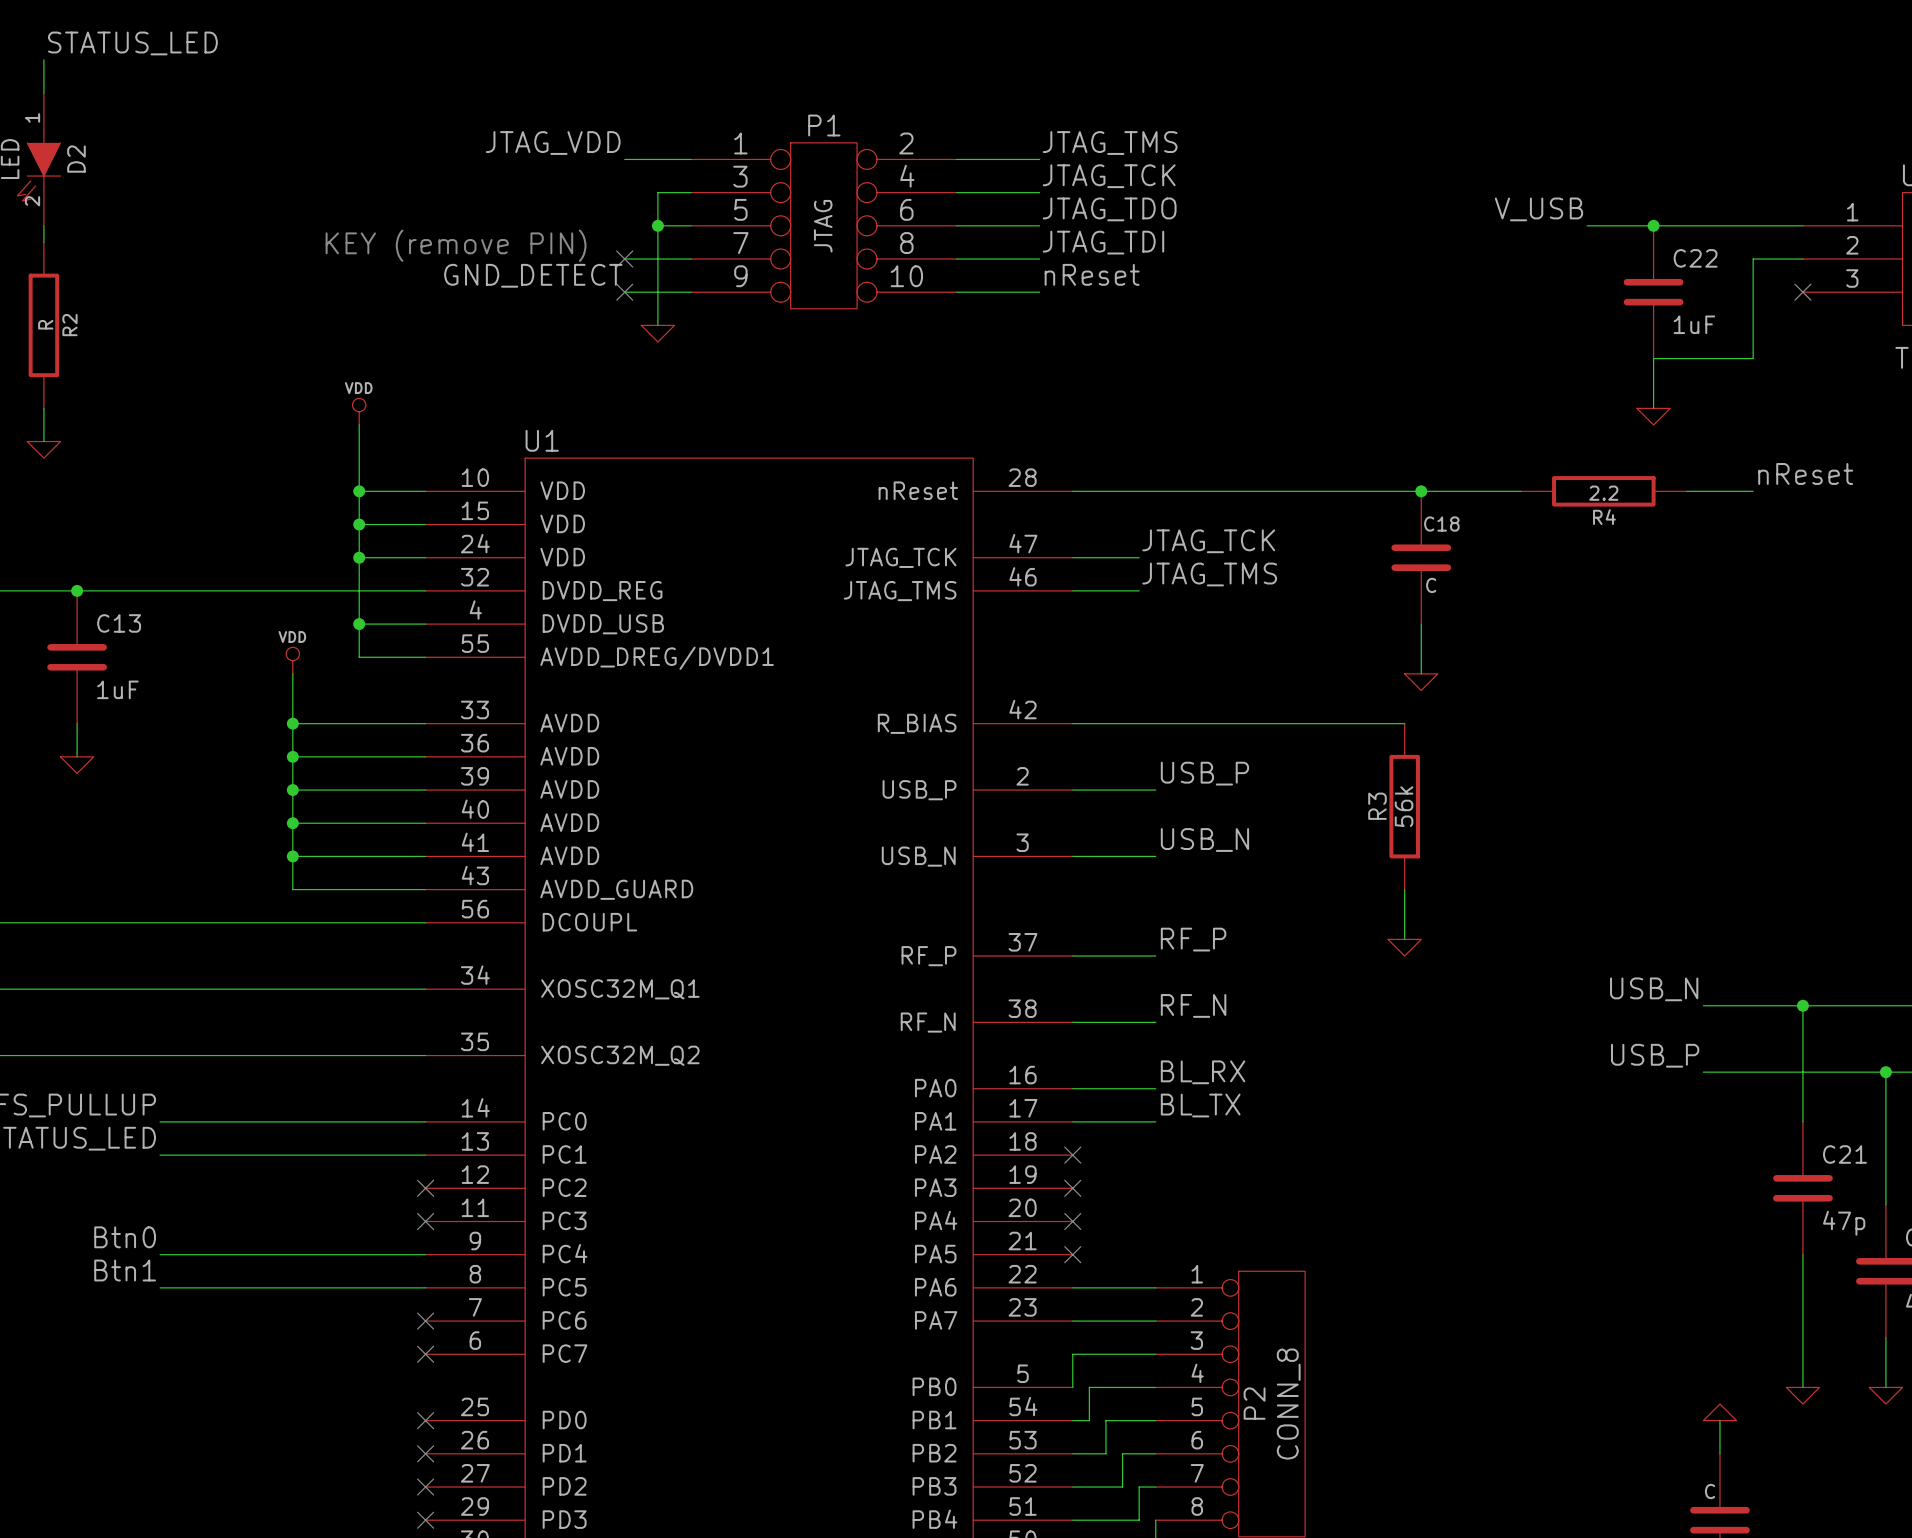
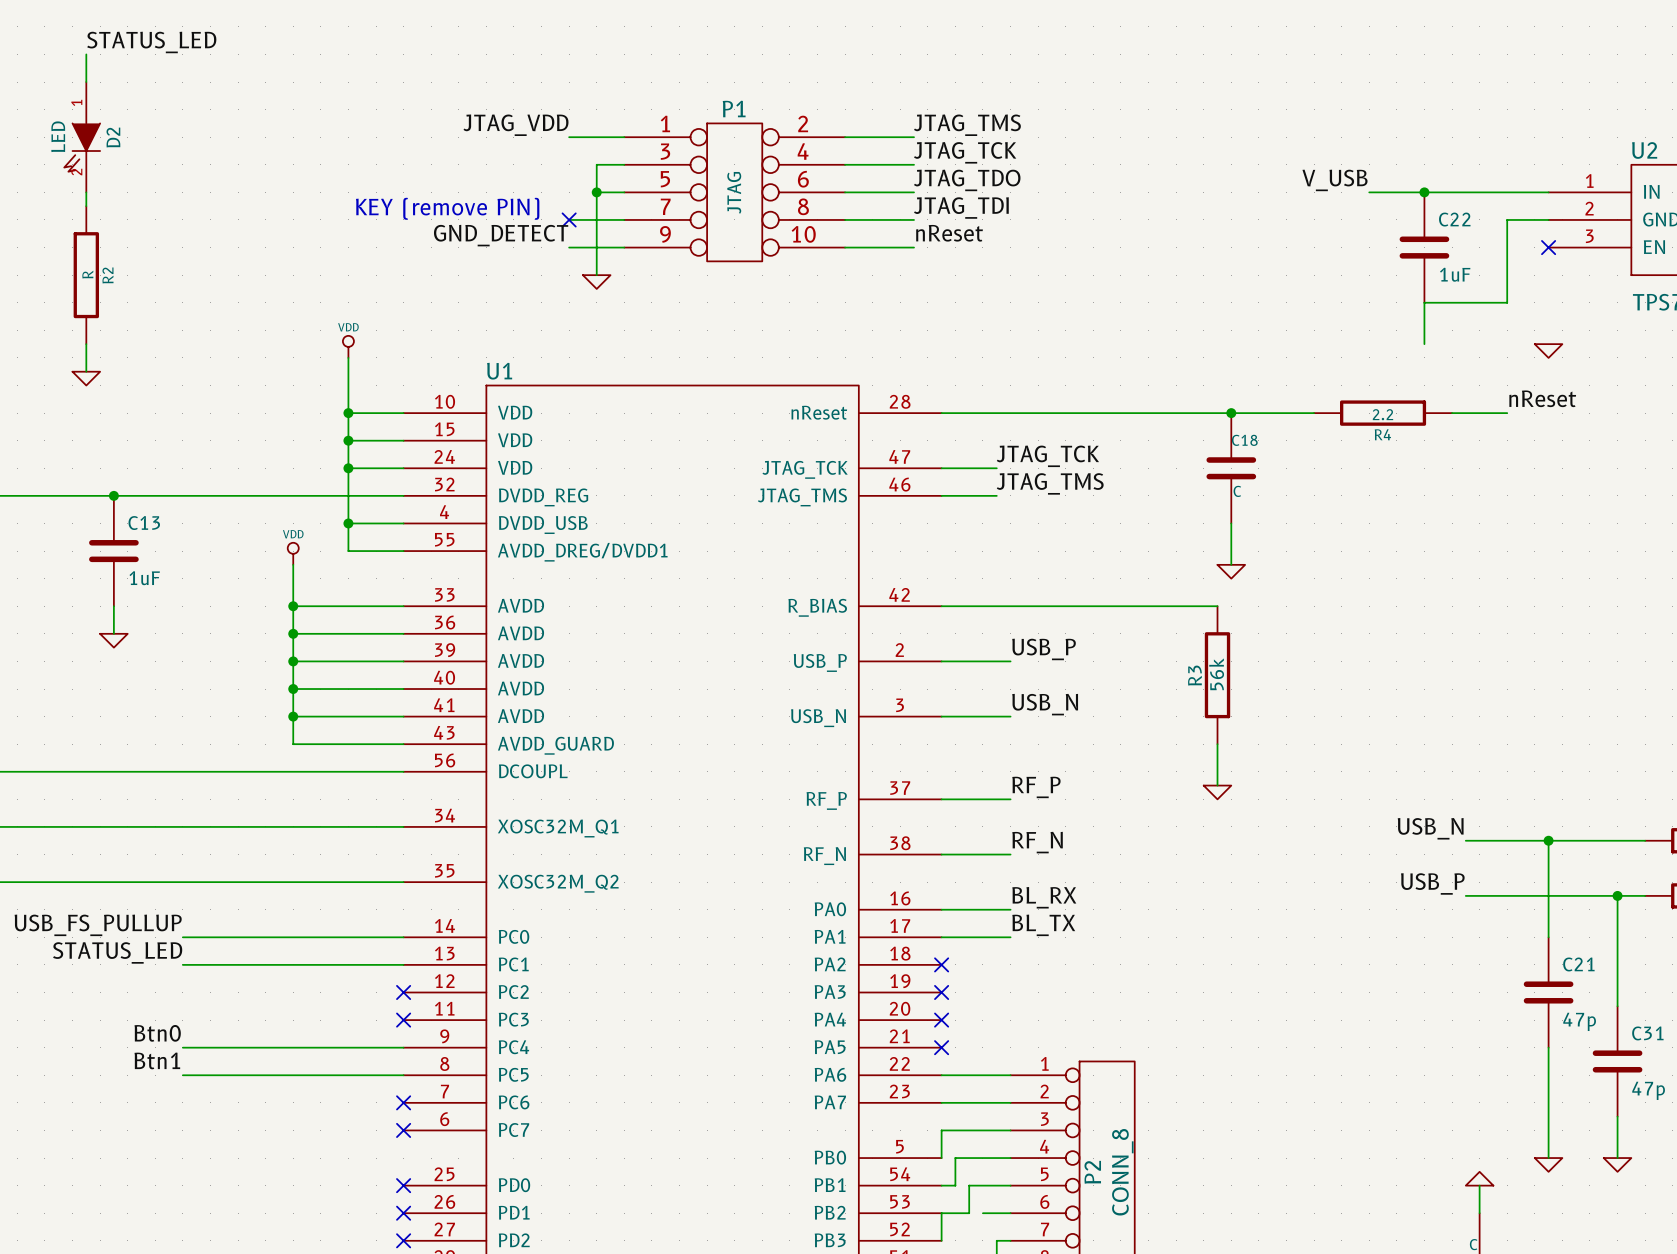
no-connect mark: (624, 292) -> none
power symbol position: (1653, 416) -> (1548, 351)
wire: (1122, 1453) (1122, 1487) (1072, 1487) -> (941, 1213) (941, 1240)

